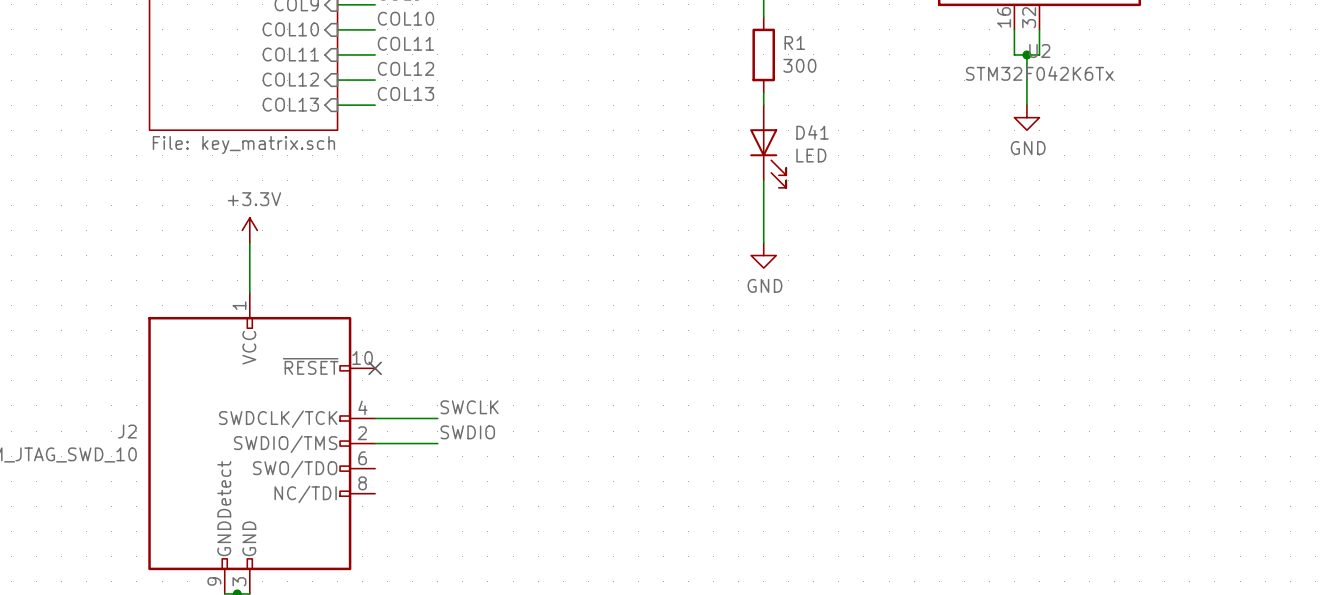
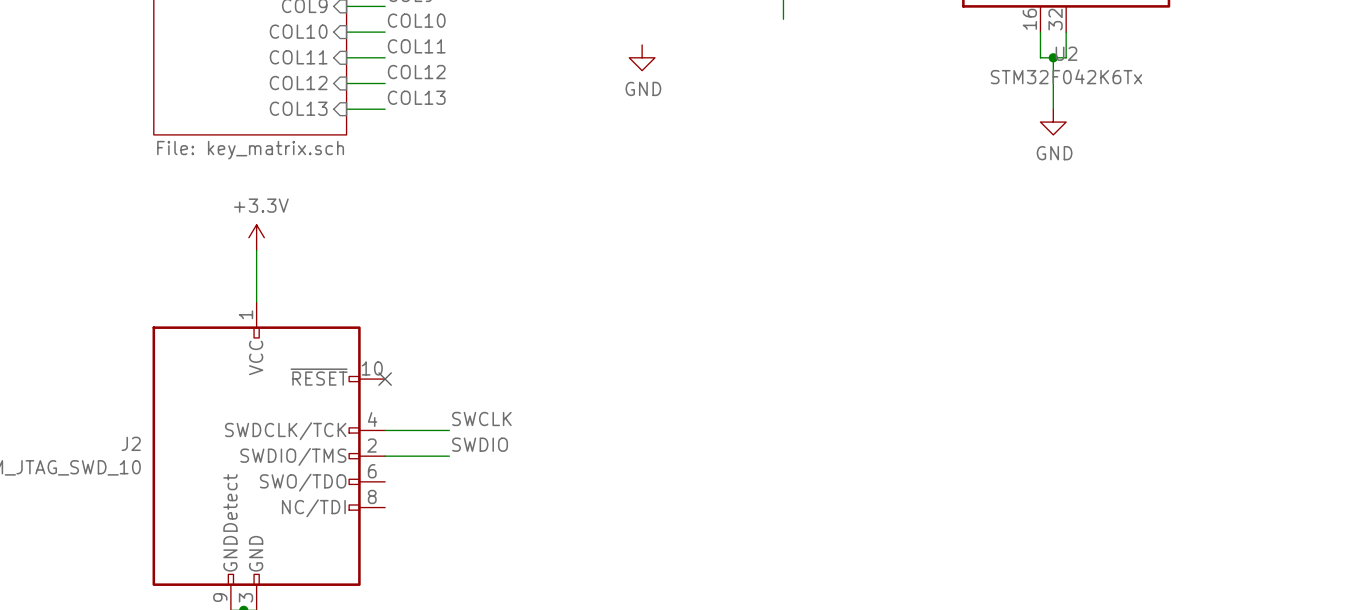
R1: 300 (763, 54) -> none
wire: (763, 92) (763, 105) -> none
D41: LED (768, 146) -> none
wire: (763, 180) (763, 243) -> none
power symbol position: GND (763, 255) -> GND (642, 57)

